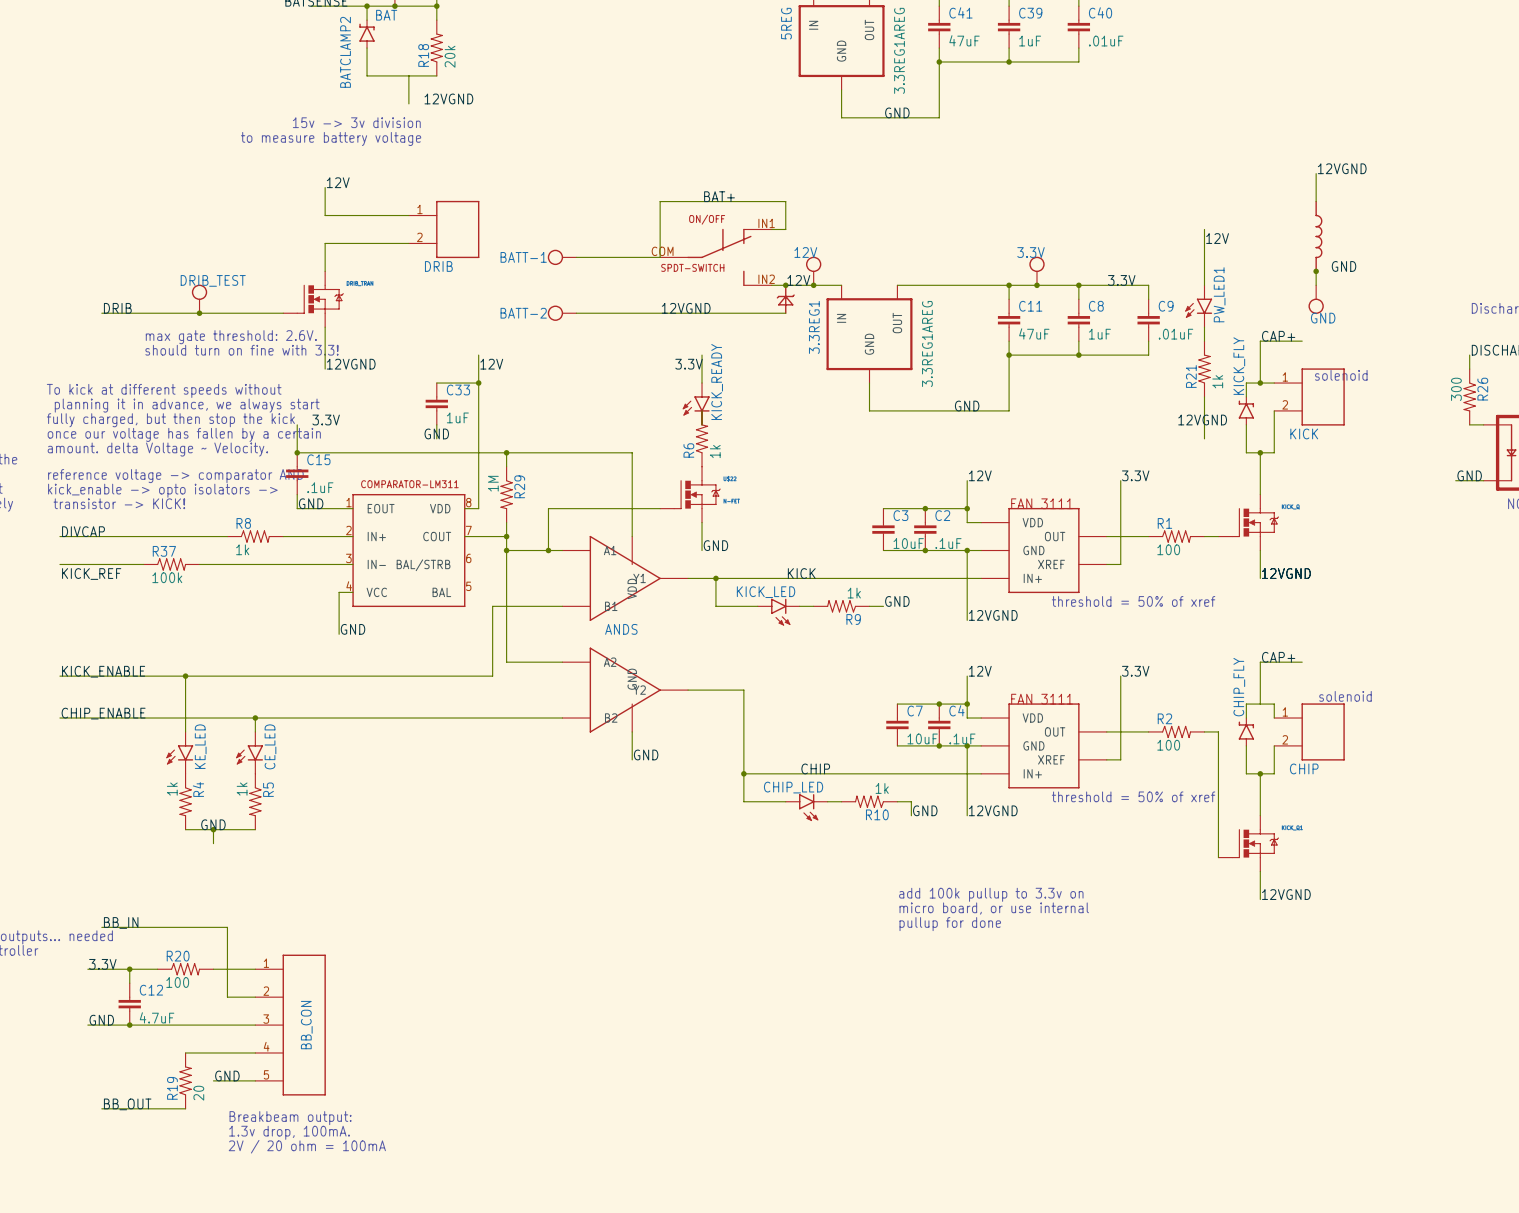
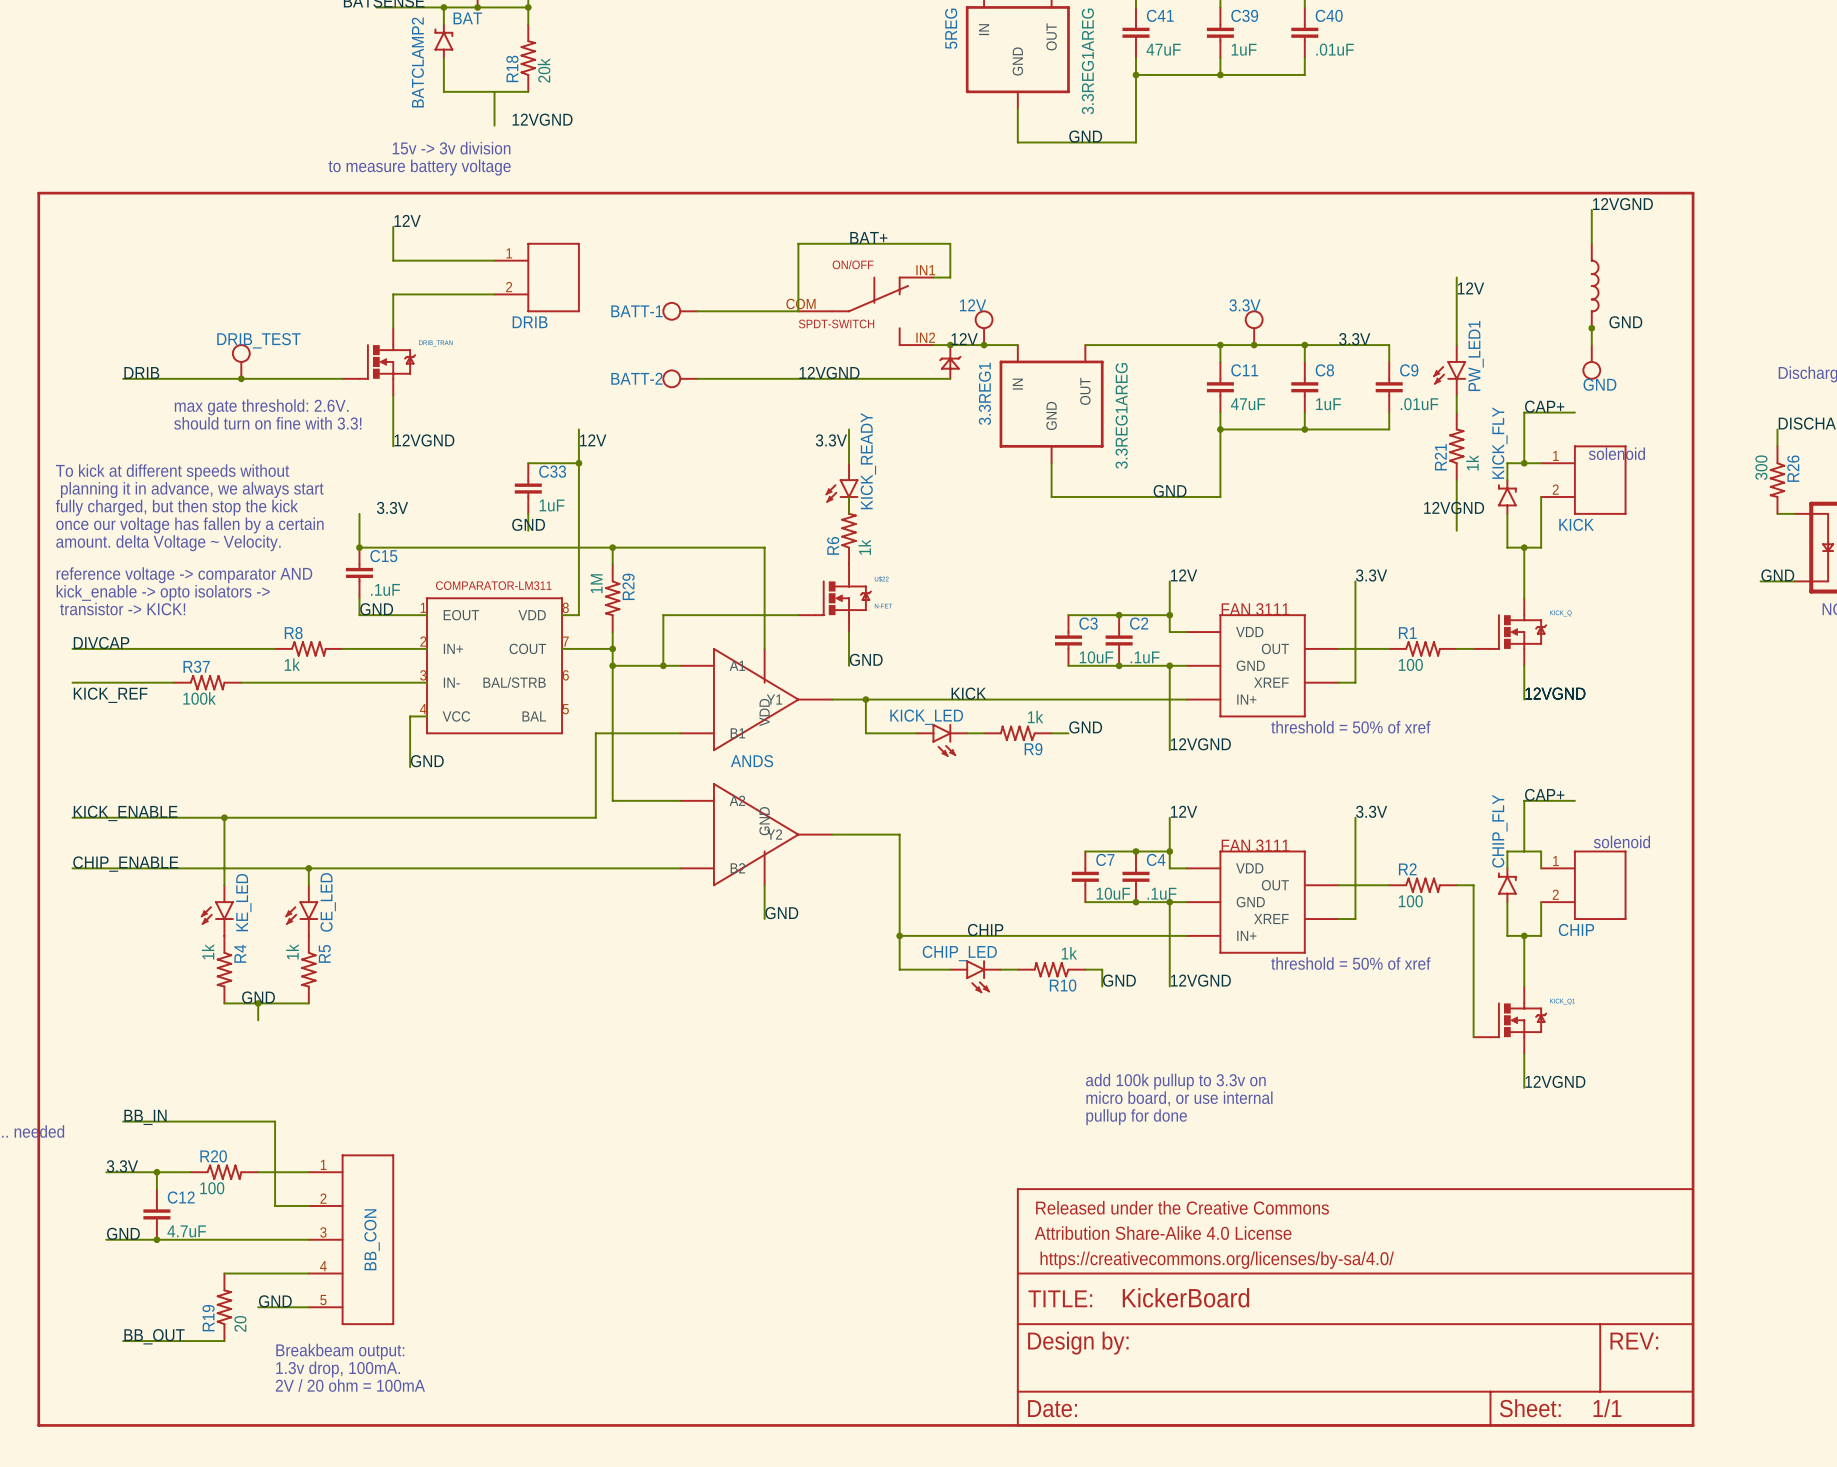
part: none -> (865, 809)
part: none -> (1355, 1307)

